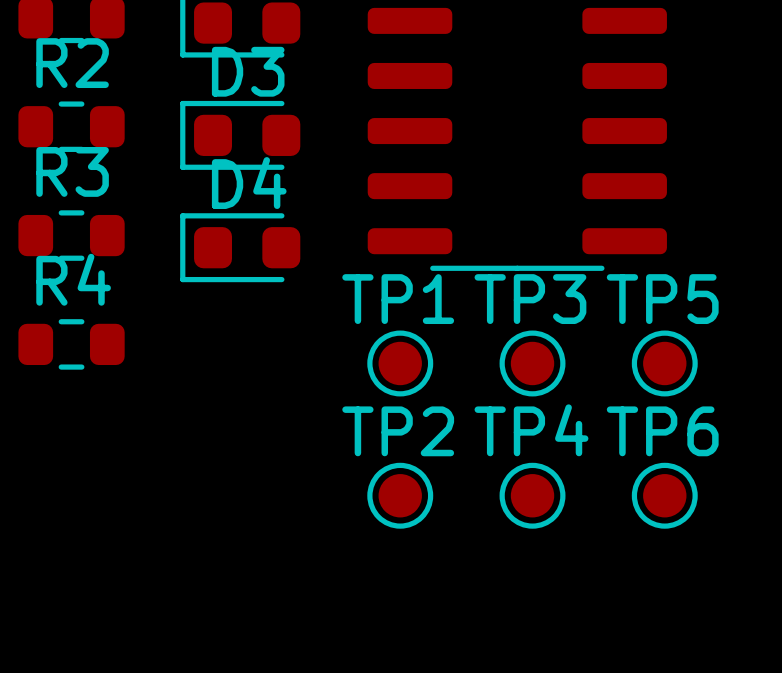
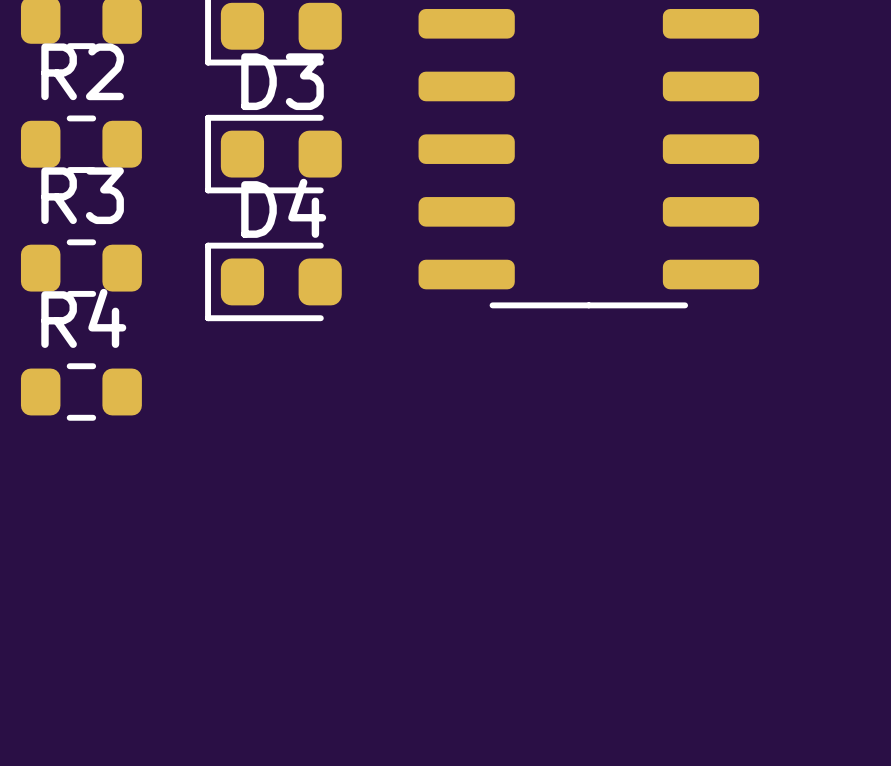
TP1: (400, 363) -> none
TP3: (532, 363) -> none
TP5: (664, 363) -> none
TP2: (400, 495) -> none
TP4: (532, 495) -> none
TP6: (664, 495) -> none

